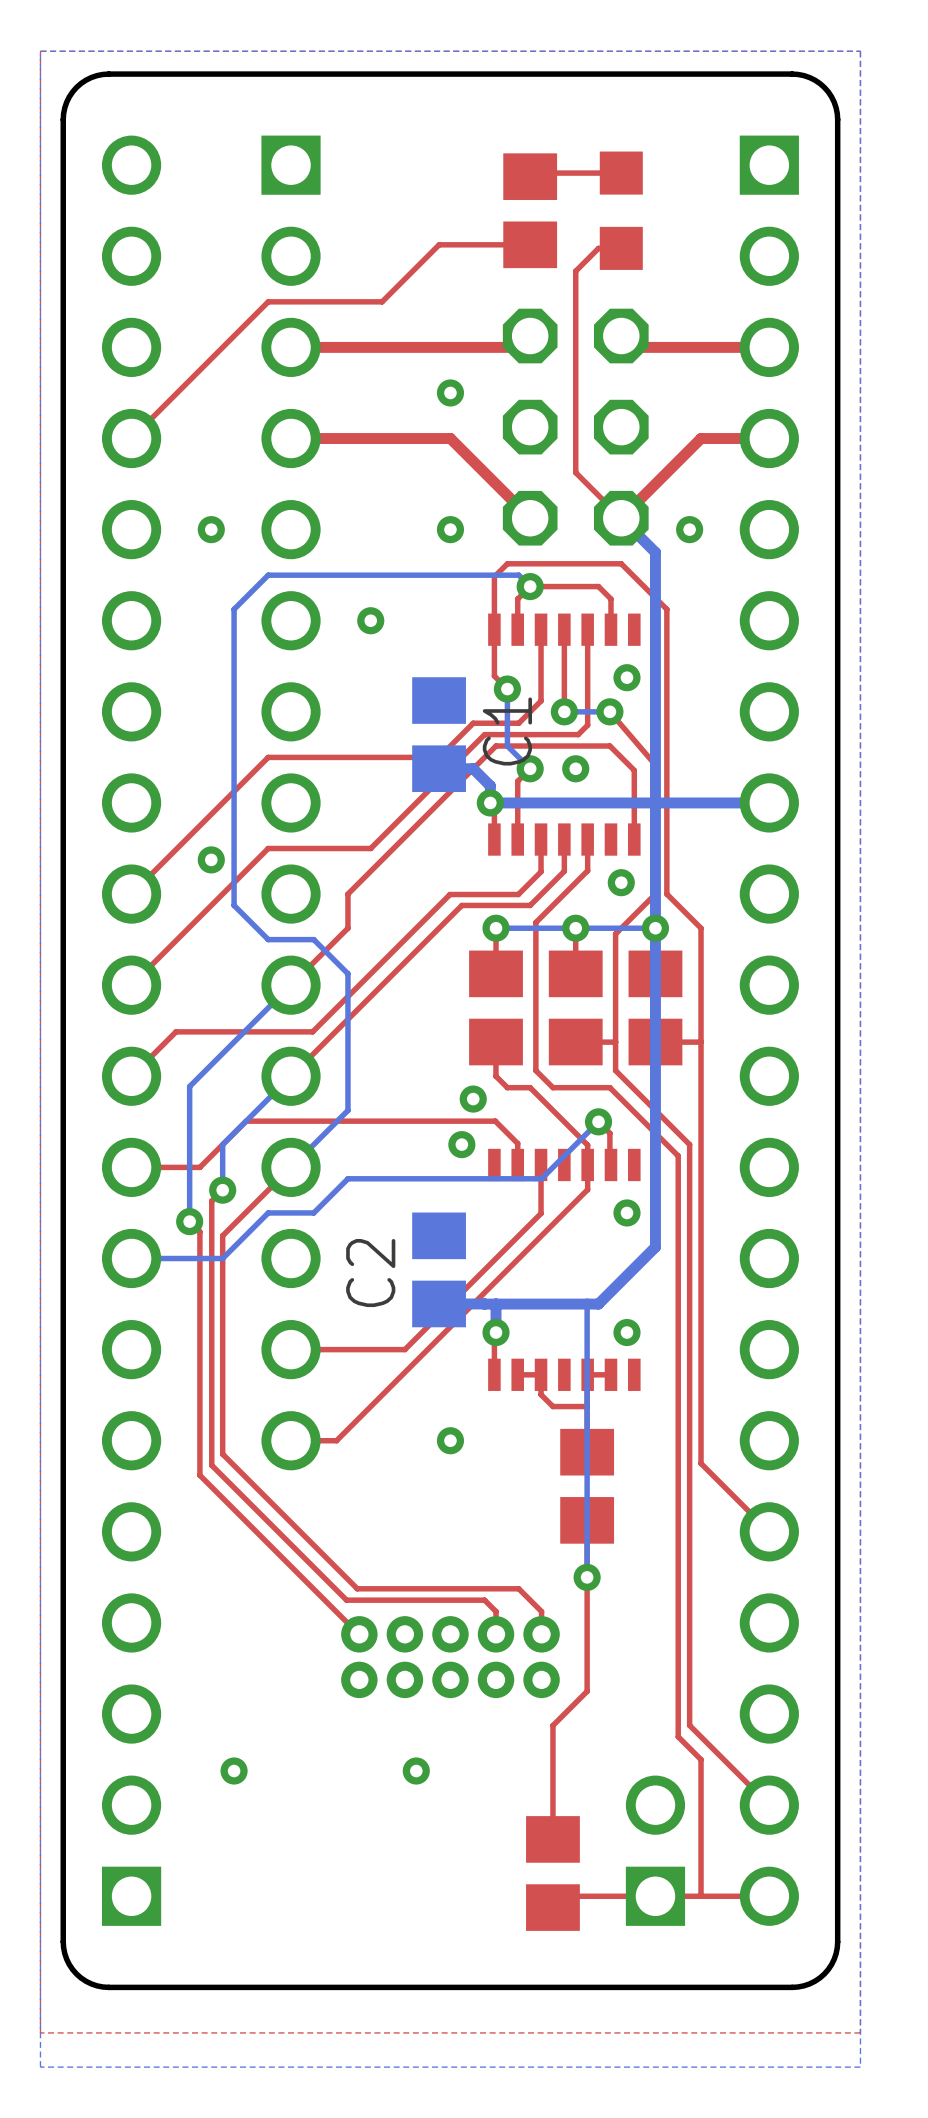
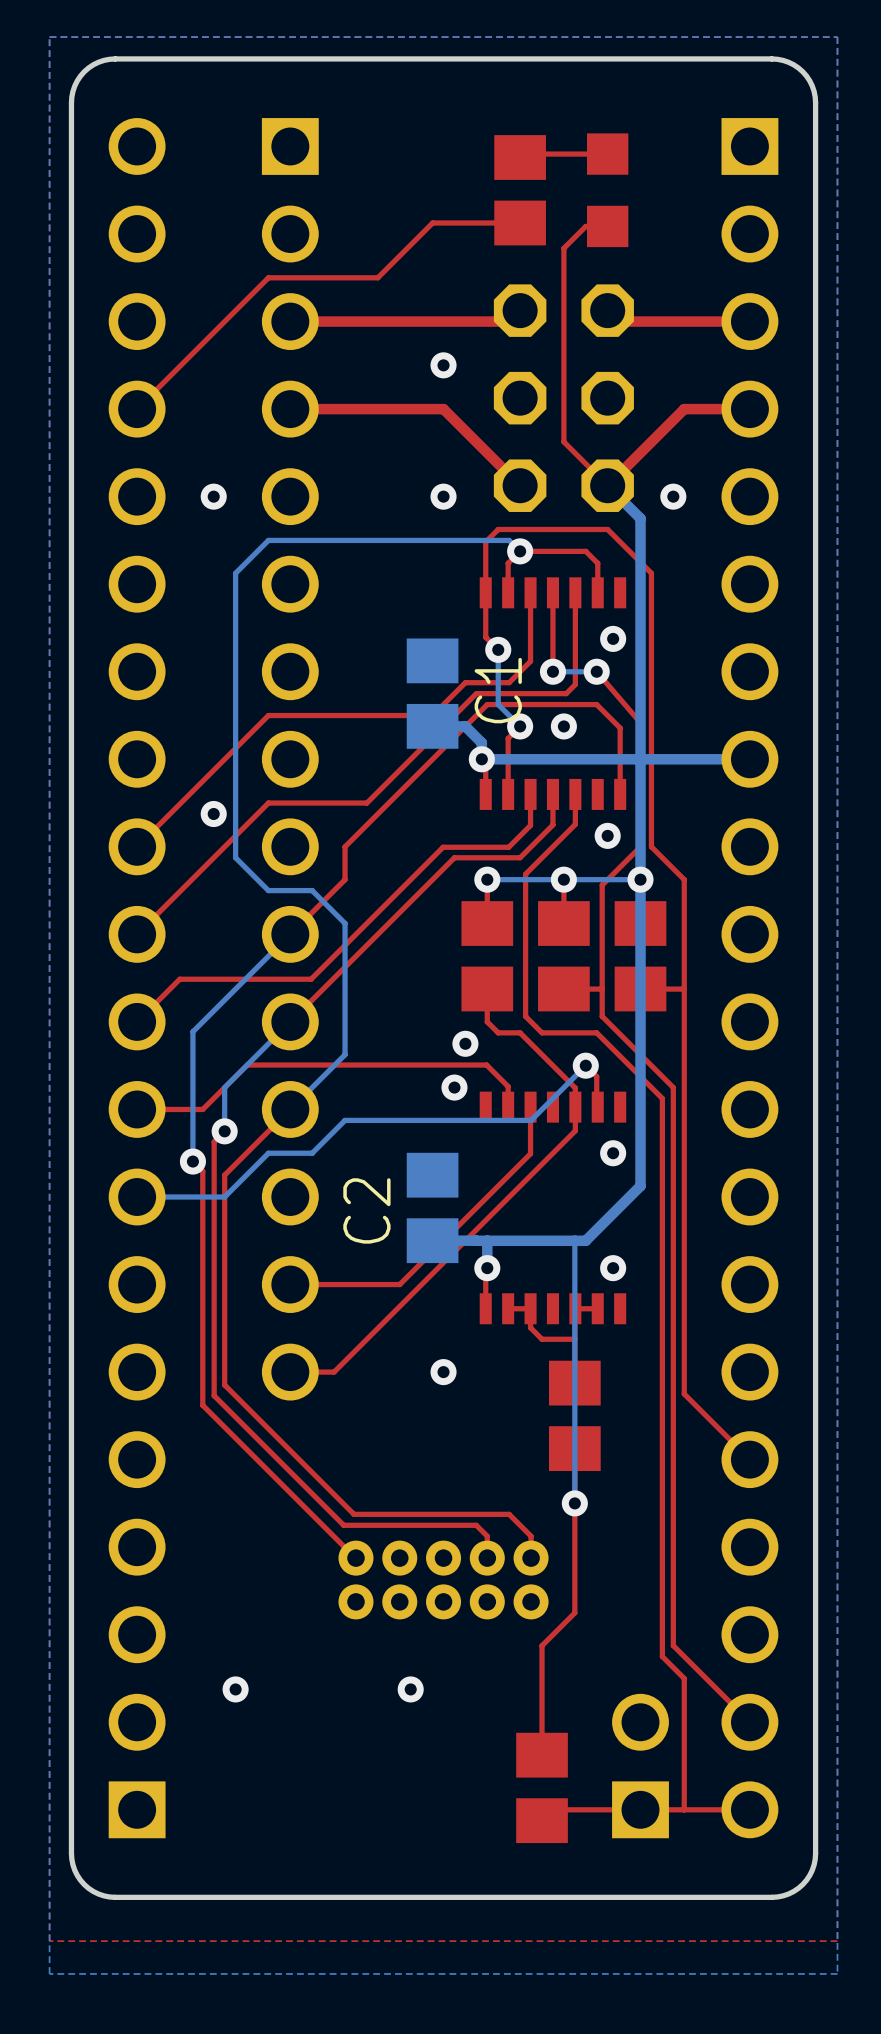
via: (370, 620) -> none

